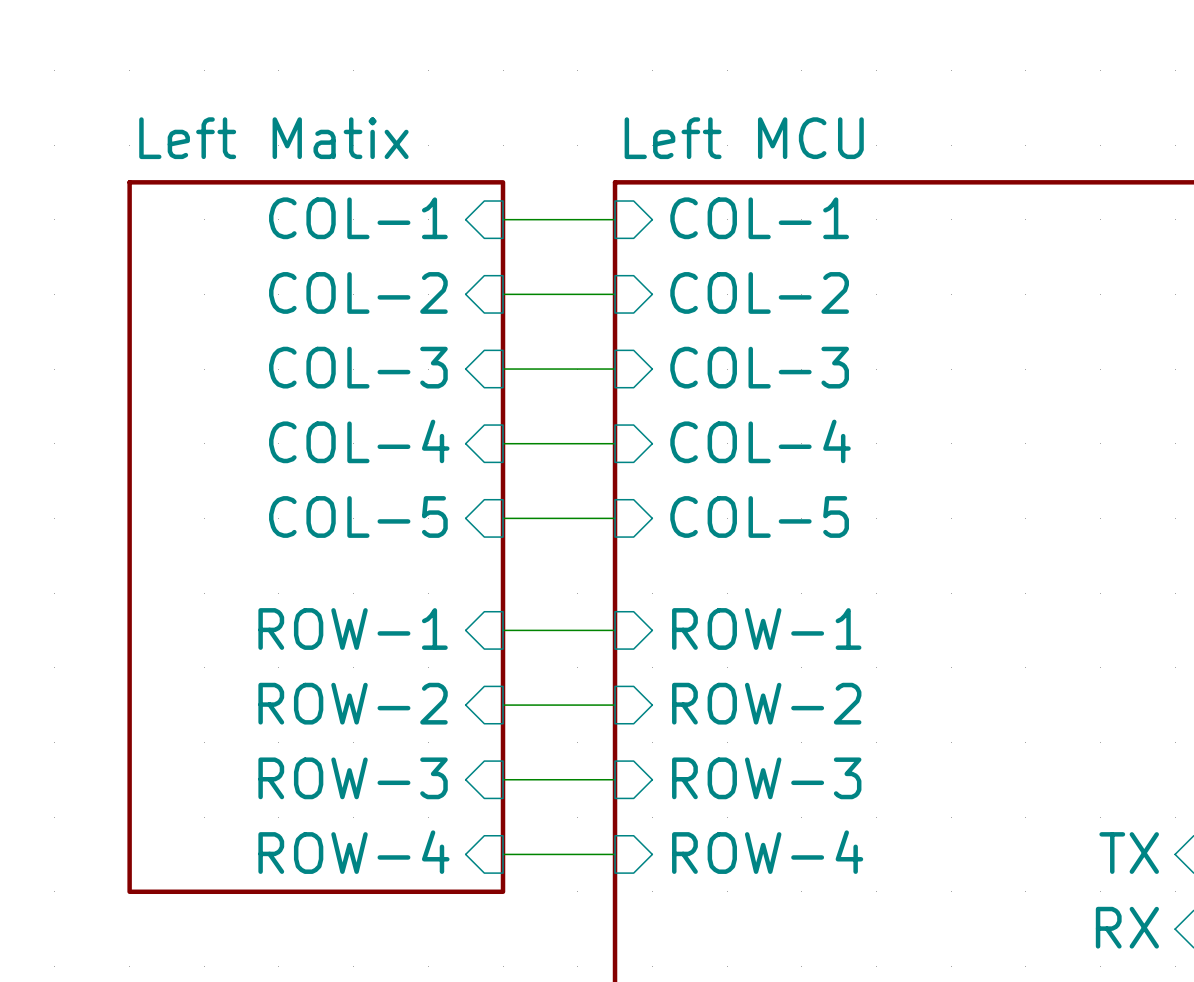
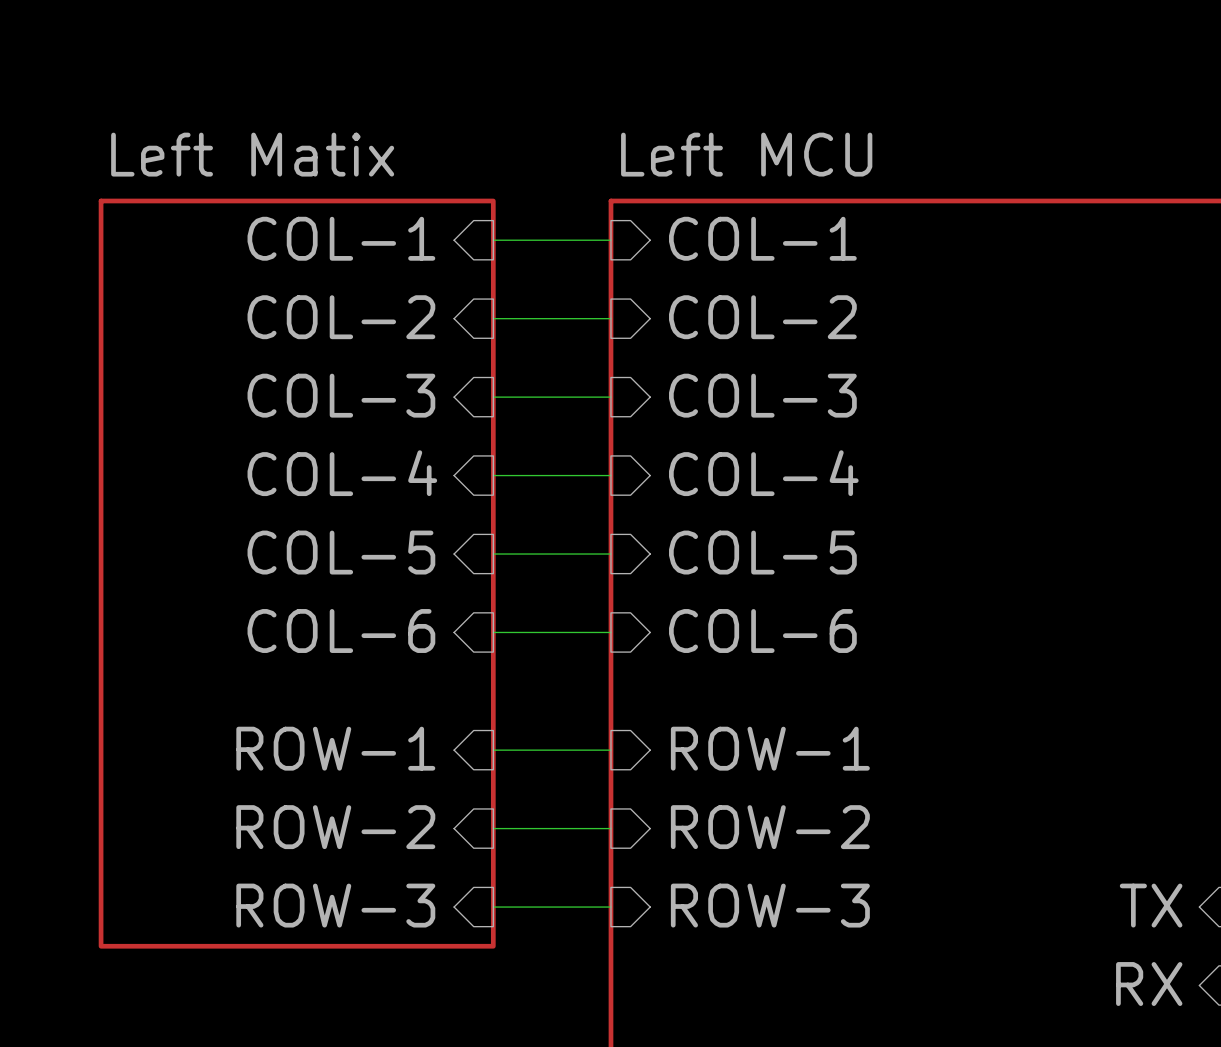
sheet pin: none -> COL-6 (341, 631)
sheet pin: none -> COL-6 (762, 631)
sheet pin: ROW-1 (353, 629) -> none
sheet pin: ROW-1 (766, 629) -> none
wire: (503, 630) (615, 630) -> (493, 632) (610, 632)
sheet pin: ROW-2 (353, 703) -> ROW-1 (335, 748)
sheet pin: ROW-2 (766, 703) -> ROW-1 (770, 748)
sheet pin: ROW-3 (353, 778) -> ROW-2 (335, 827)
sheet pin: ROW-3 (766, 778) -> ROW-2 (770, 827)
sheet pin: ROW-4 (353, 852) -> ROW-3 (335, 905)
sheet pin: ROW-4 (767, 852) -> ROW-3 (770, 905)

